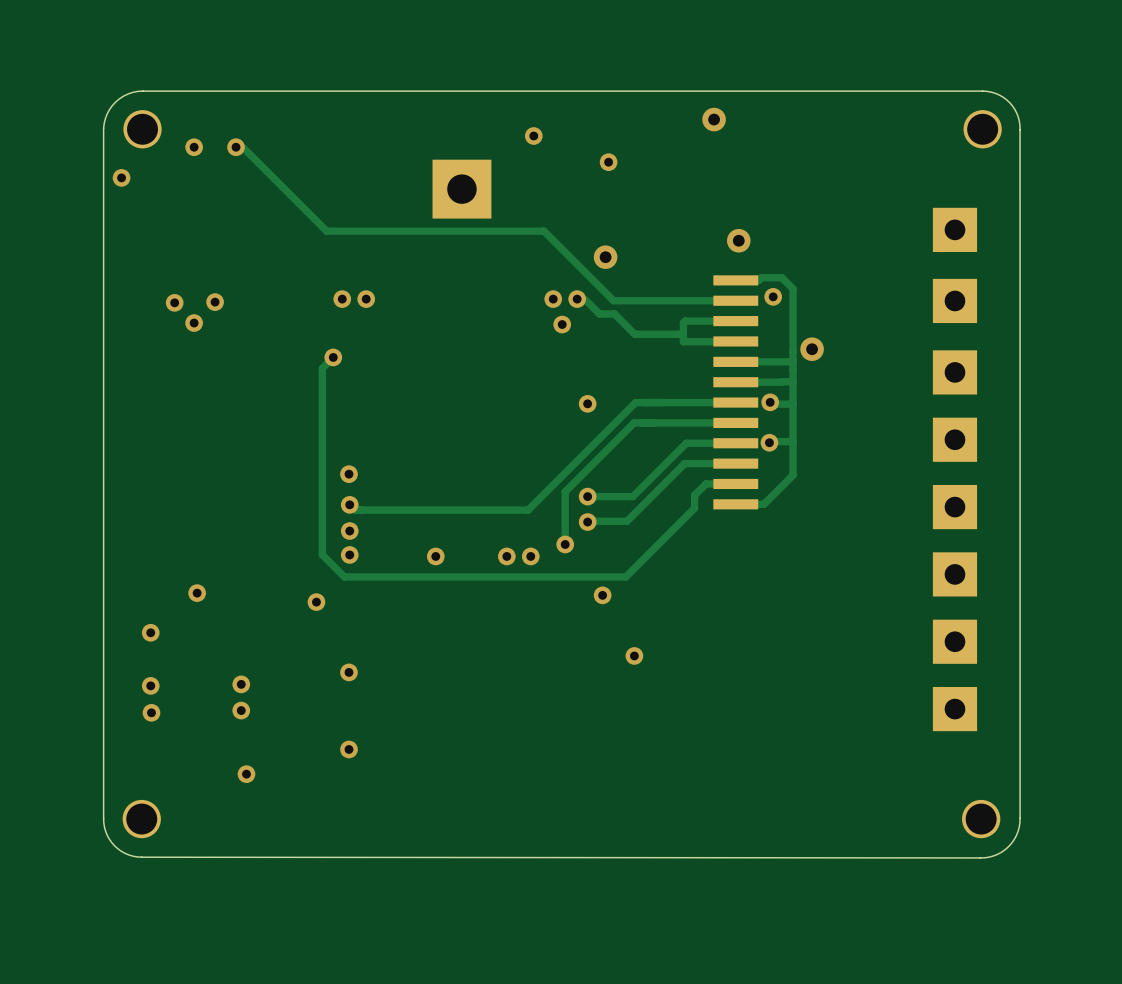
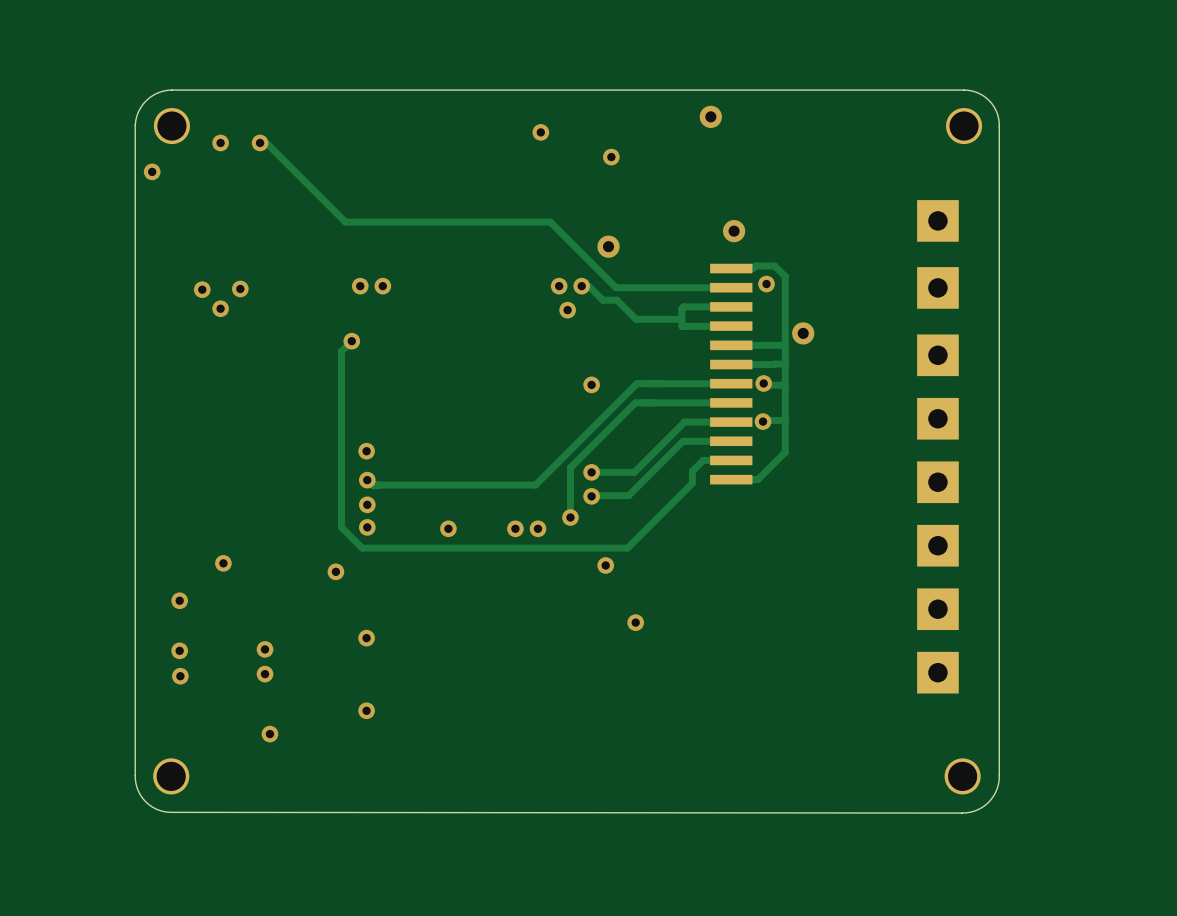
part: (461, 189) -> none

